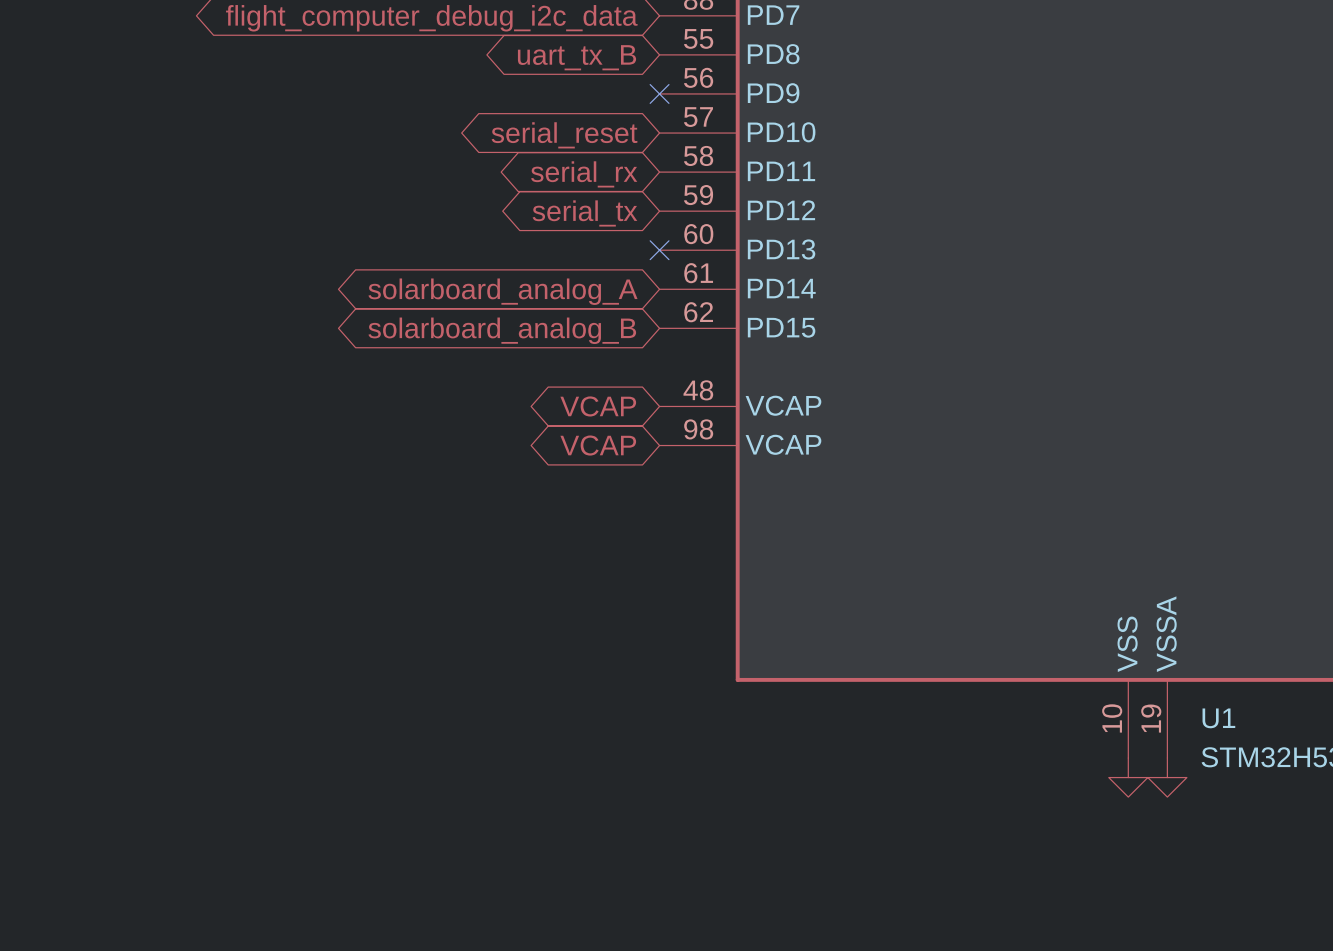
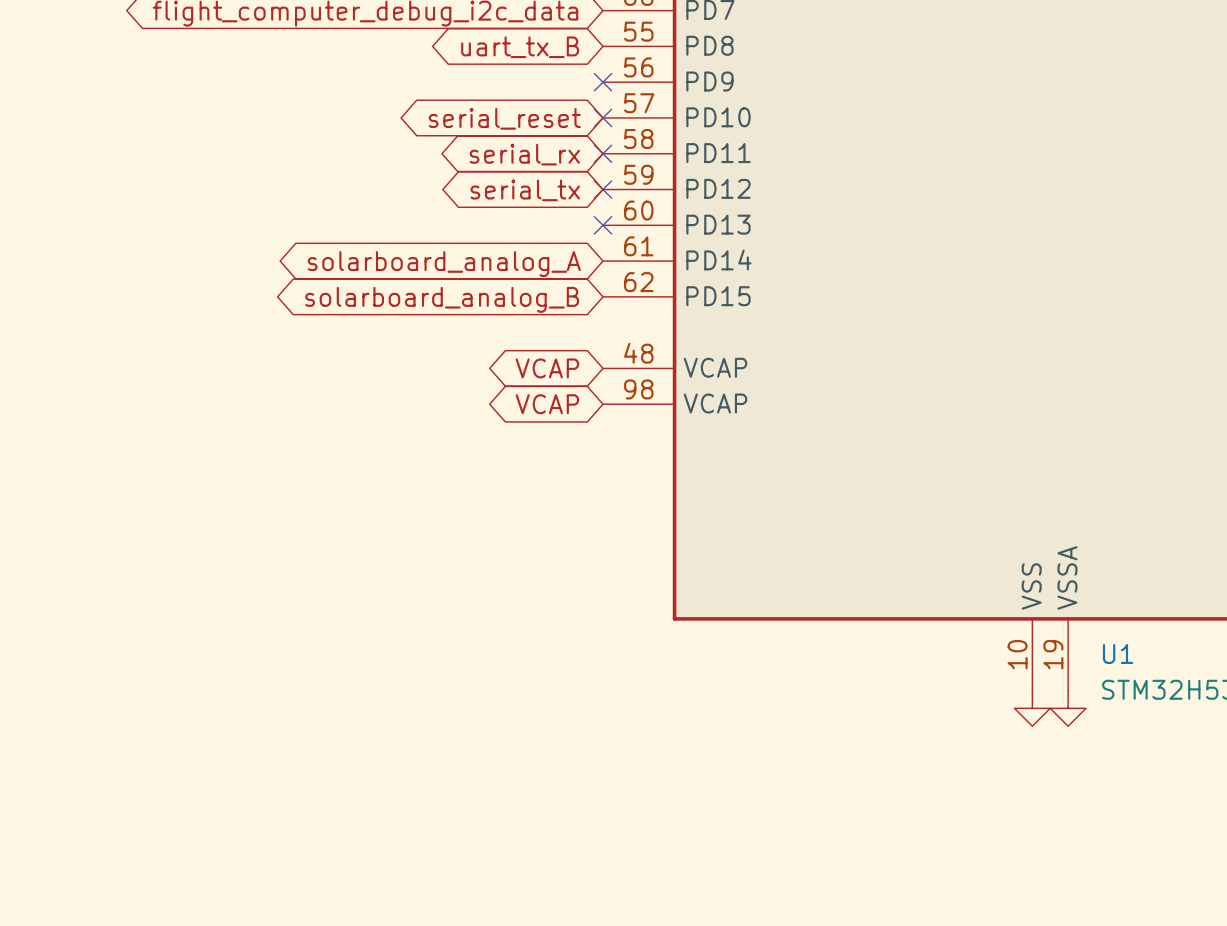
no-connect mark: none -> (603, 117)
no-connect mark: none -> (603, 153)
no-connect mark: none -> (603, 189)

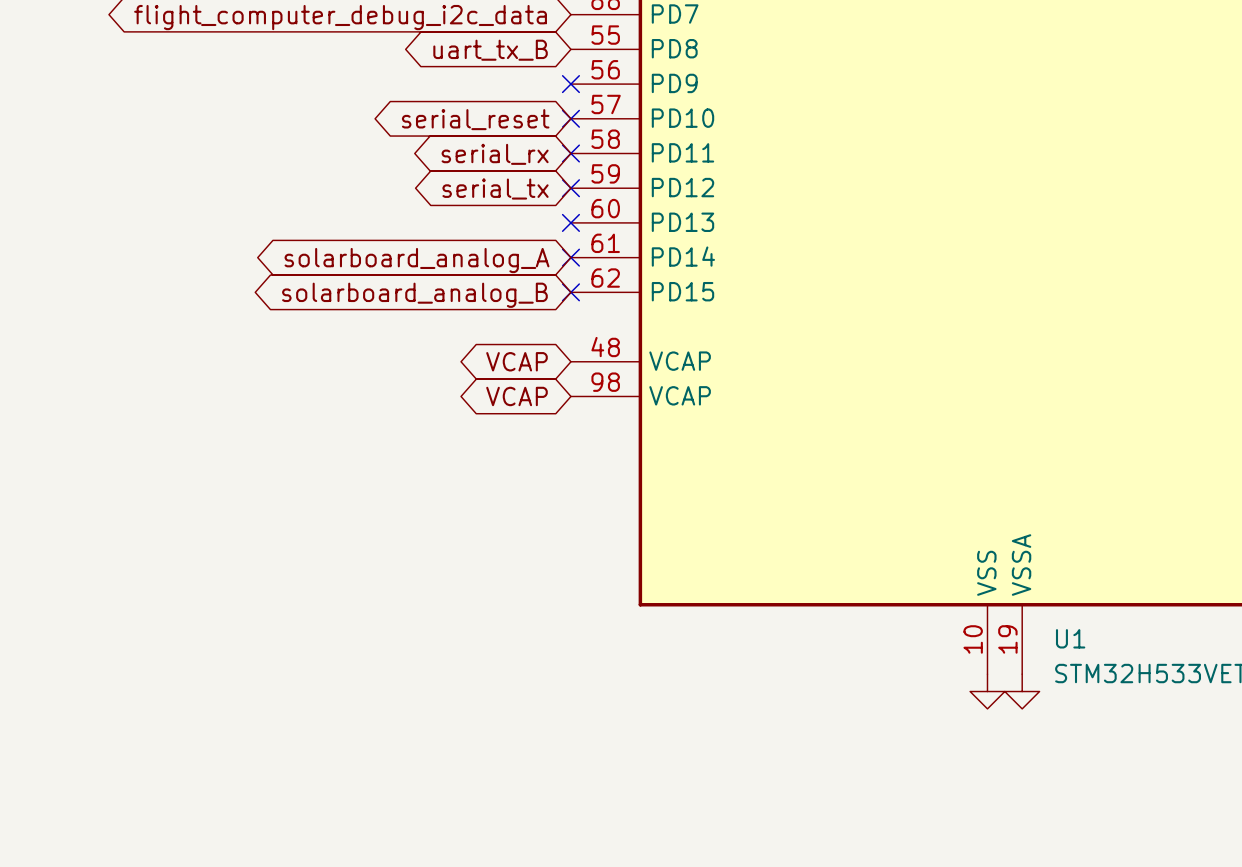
no-connect mark: none -> (570, 257)
no-connect mark: none -> (570, 292)

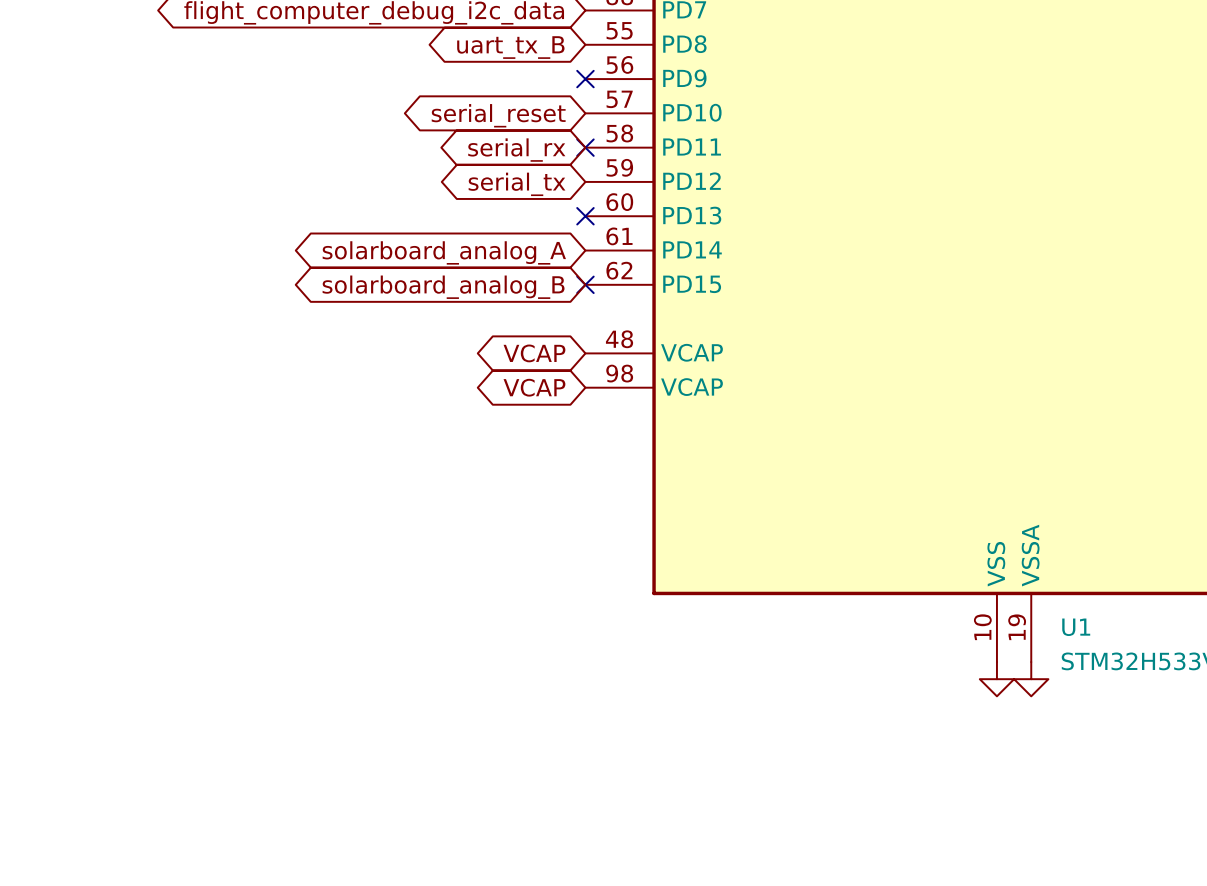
no-connect mark: (570, 118) -> none
no-connect mark: (570, 188) -> none
no-connect mark: (570, 257) -> none

